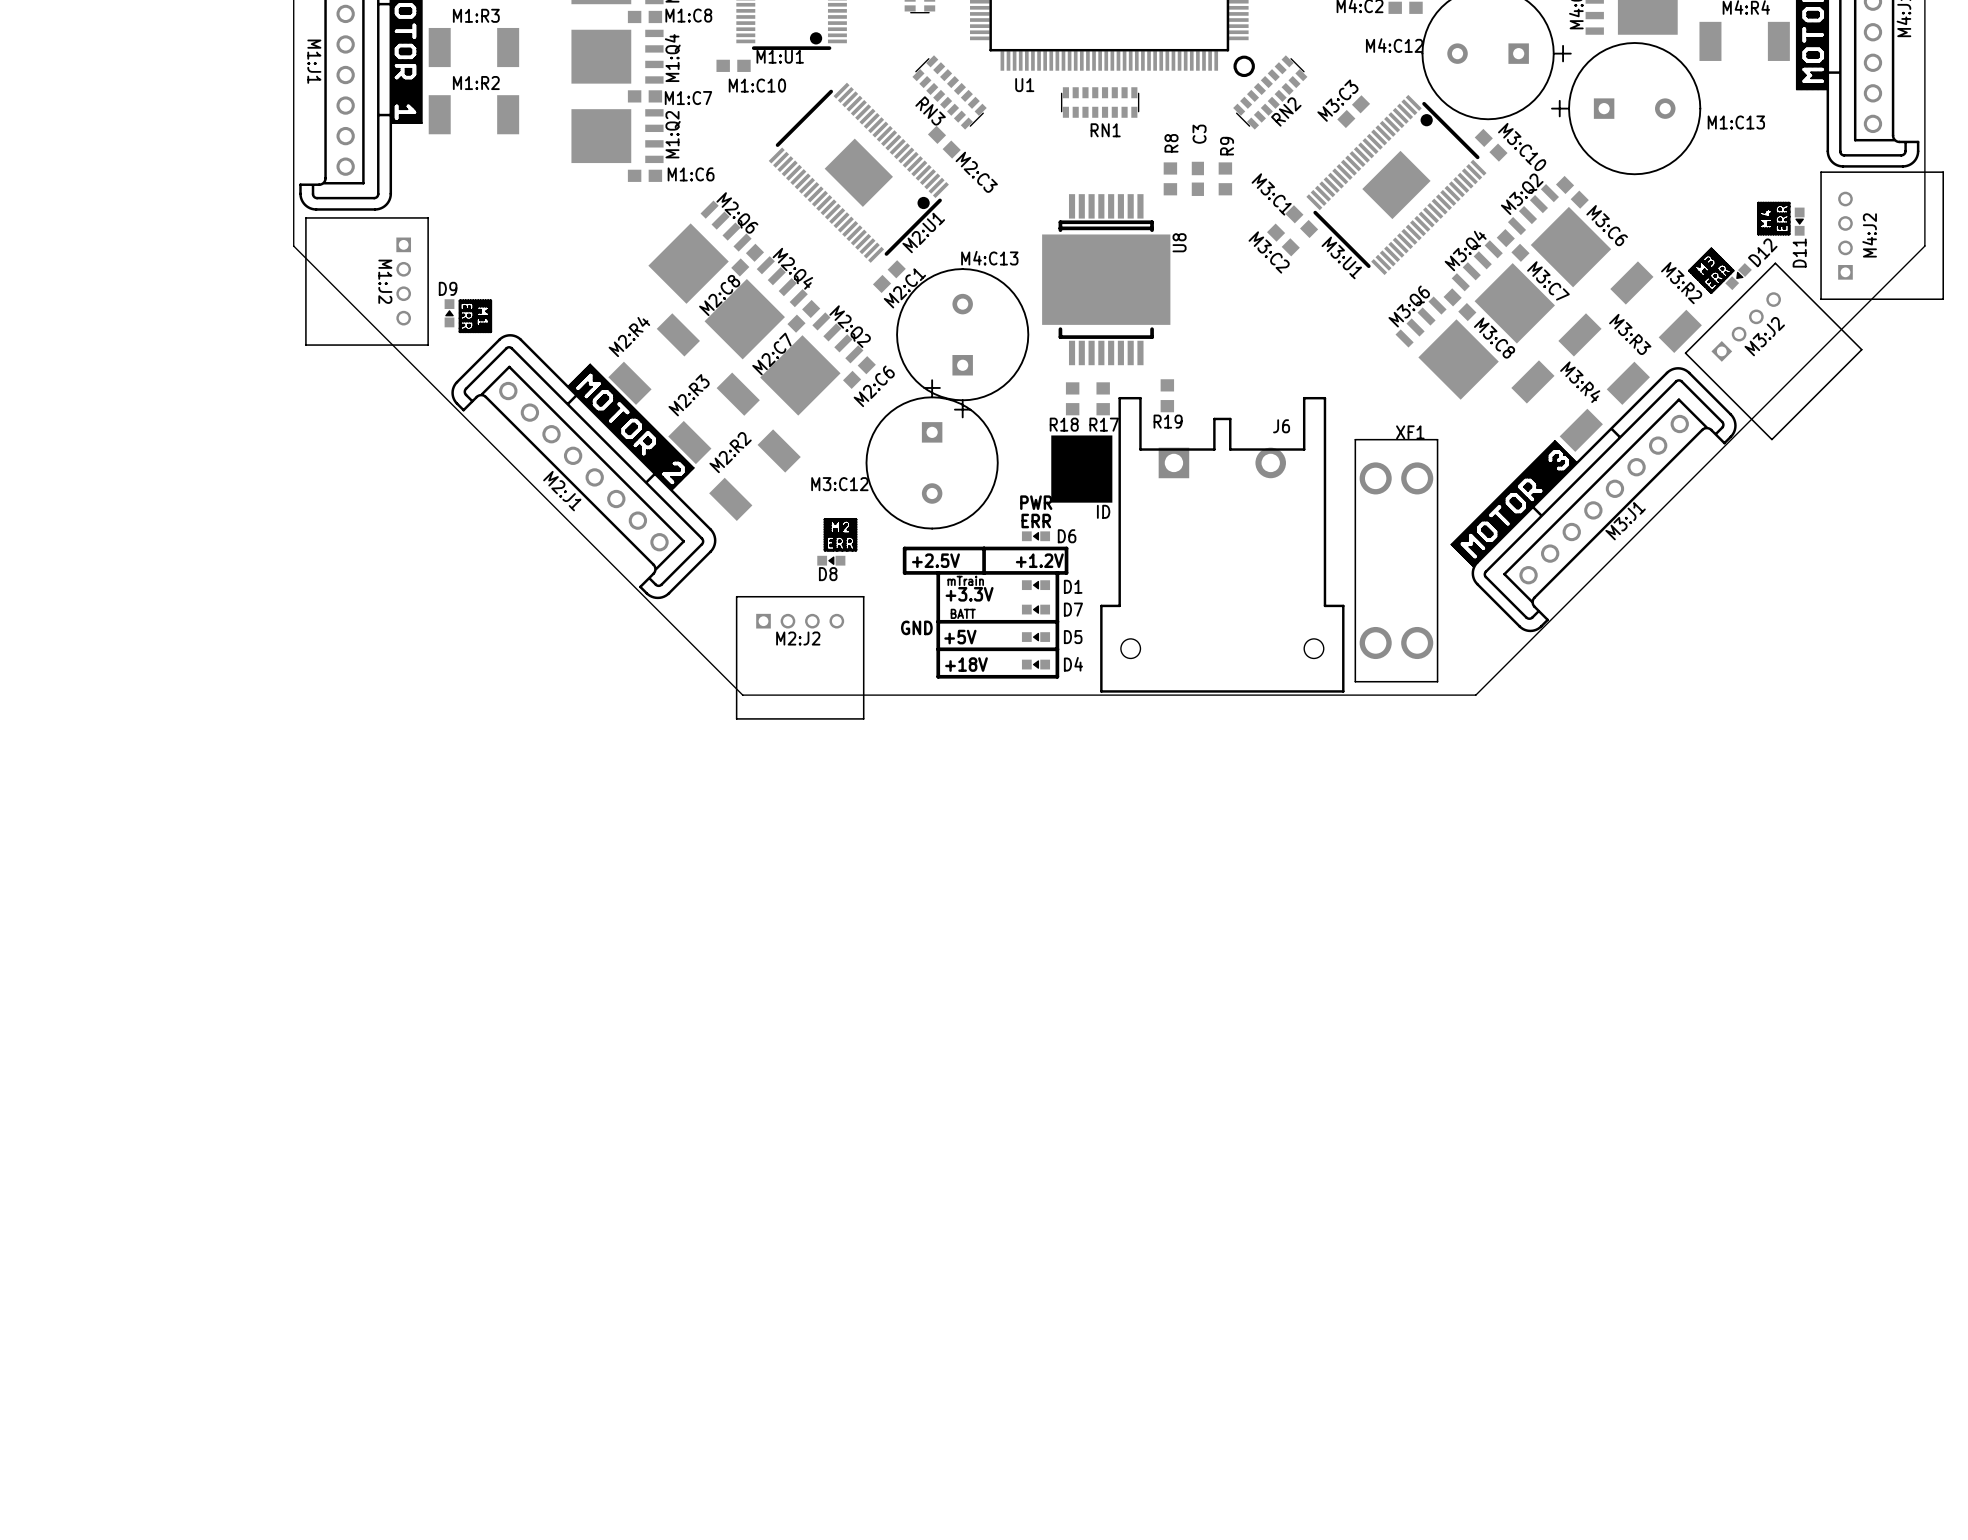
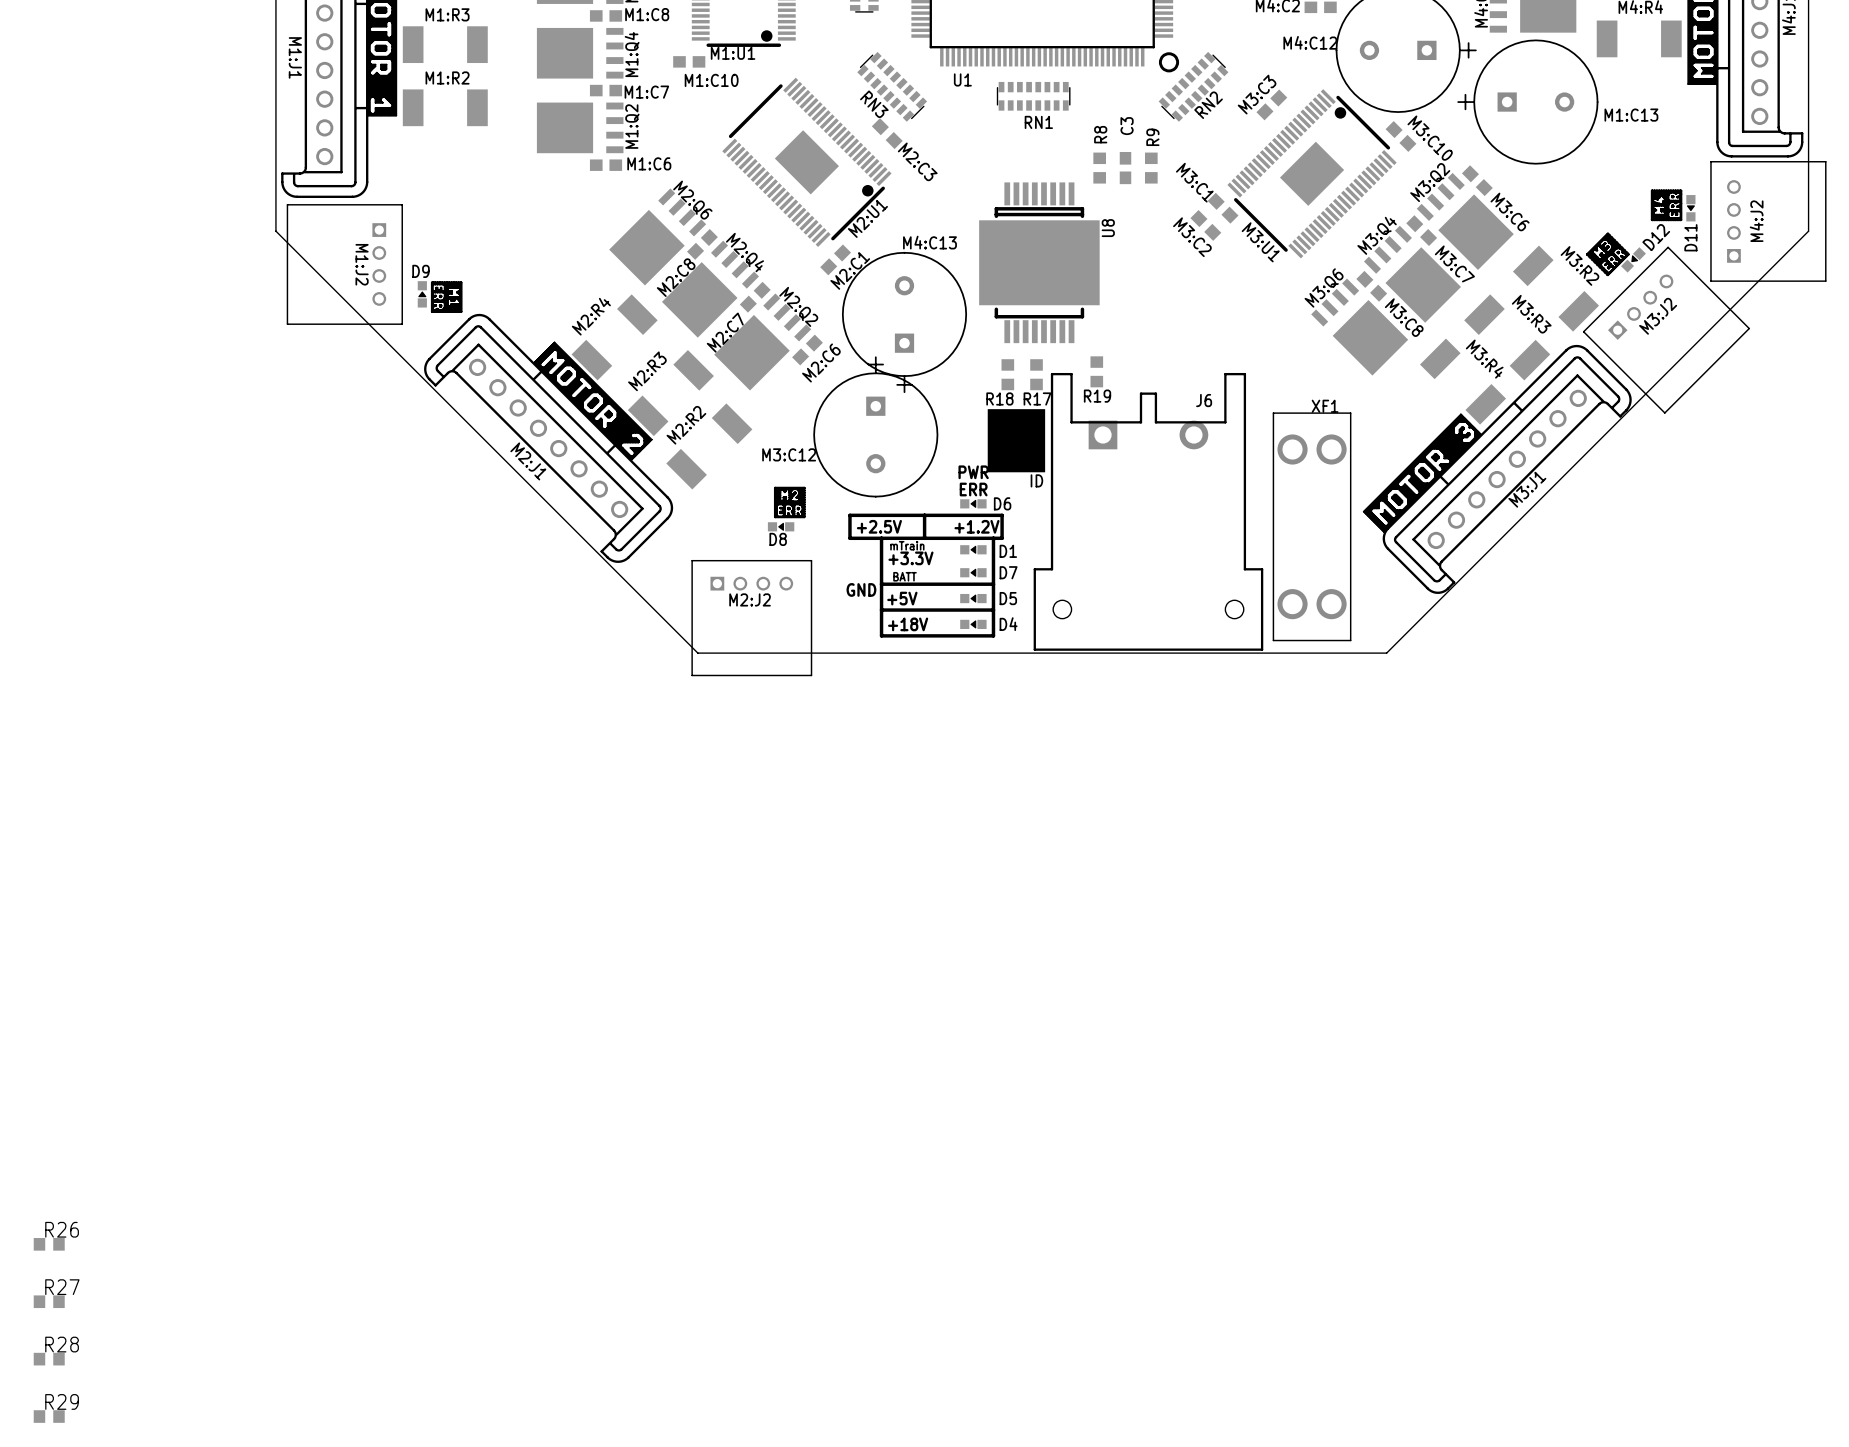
R26: none -> (49, 1244)
R27: none -> (49, 1301)
R28: none -> (49, 1359)
R29: none -> (49, 1416)

